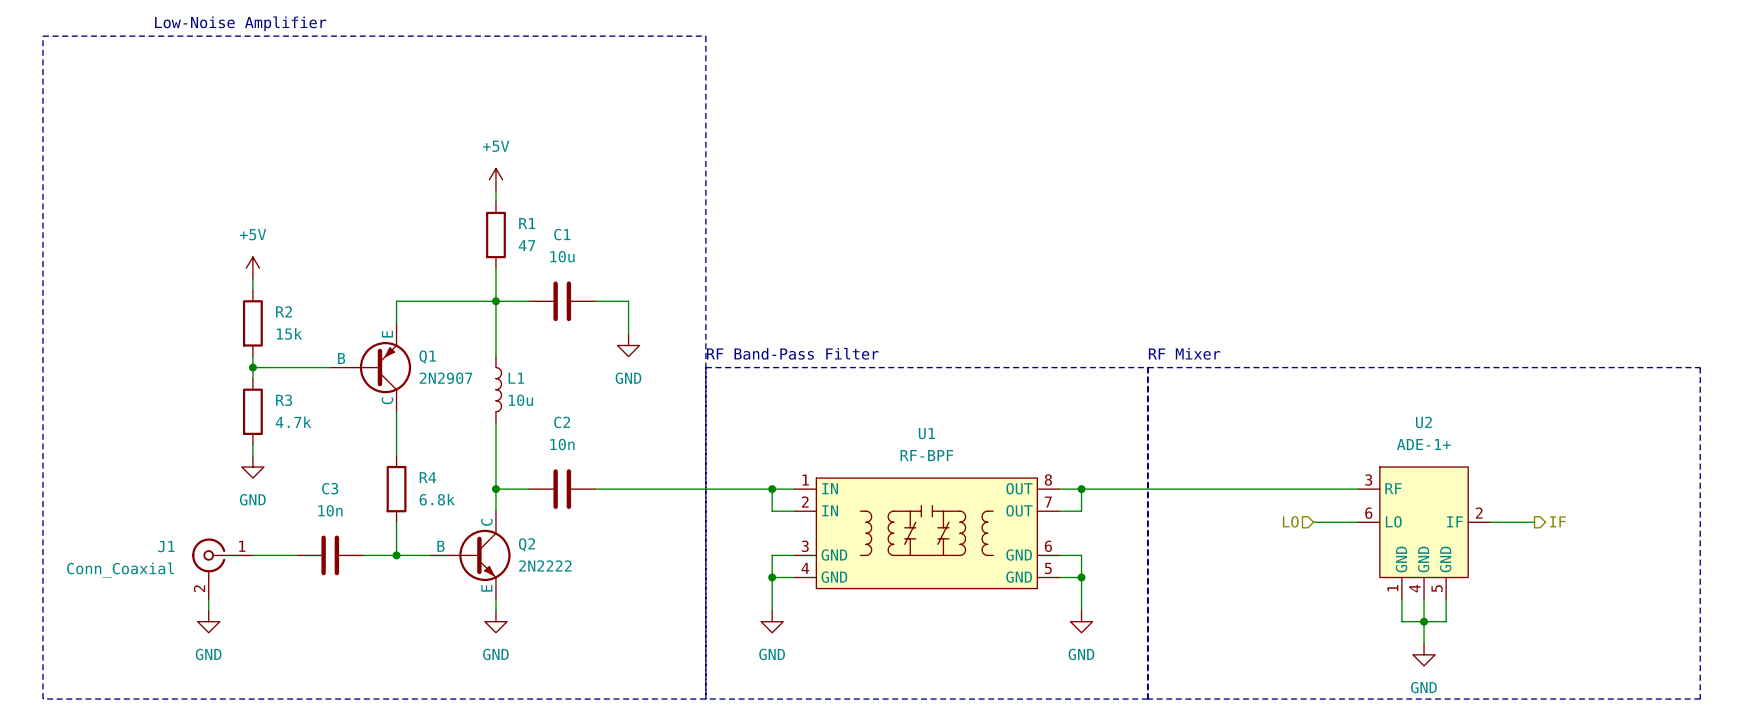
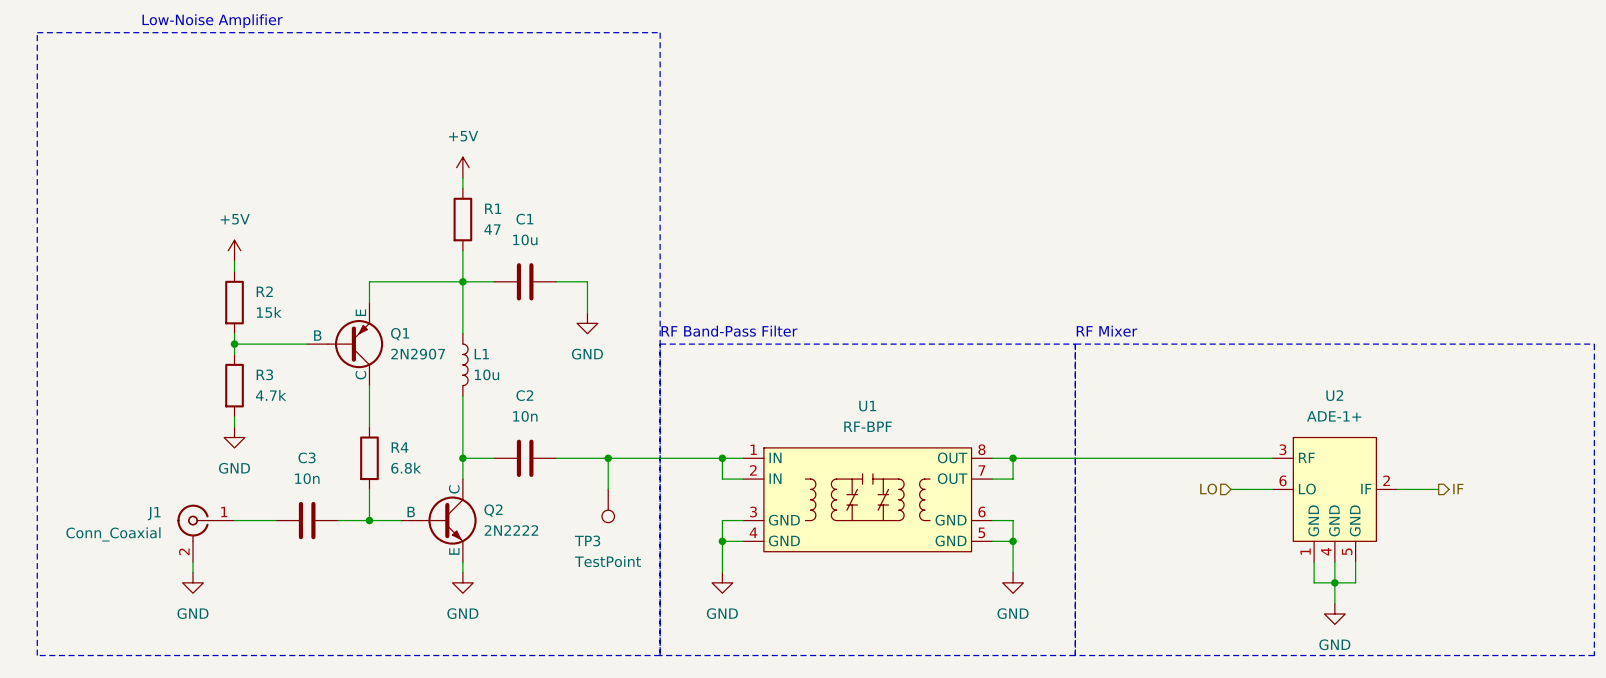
wire: none -> (608, 458) (608, 489)
junction: none -> (608, 458)
TP3: none -> TestPoint (608, 506)

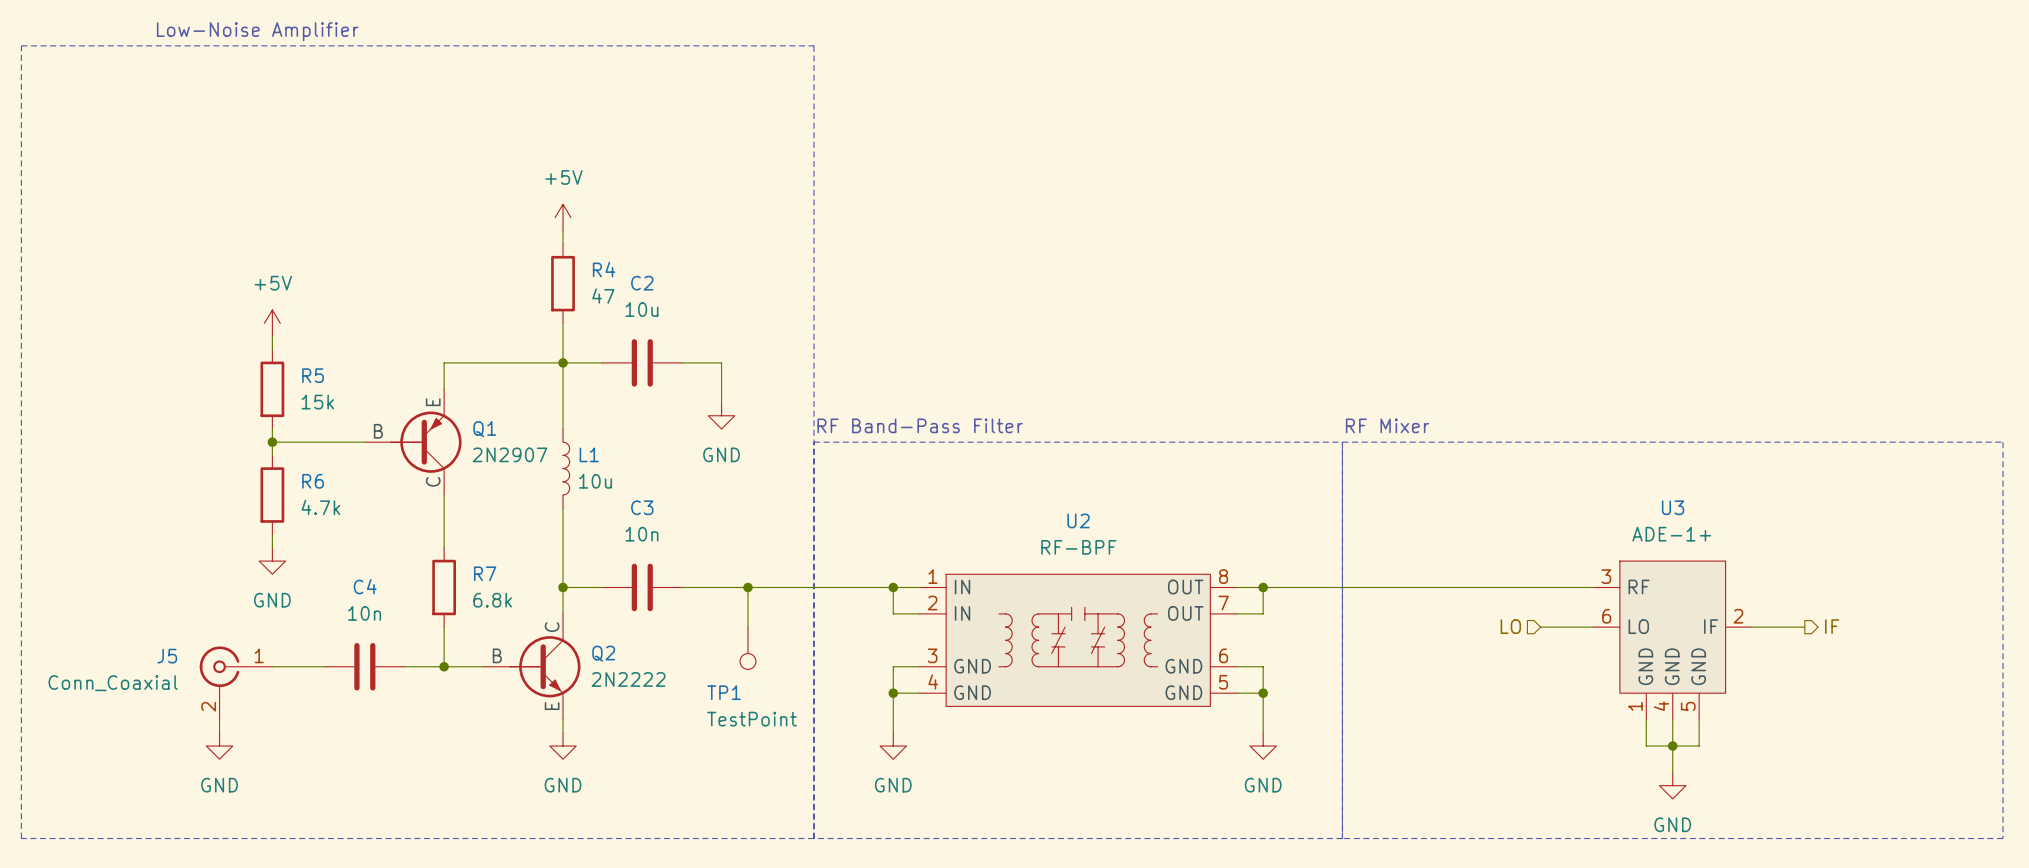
R1 name: R1 (493, 208) -> R4 (604, 269)
C1 name: C1 (524, 219) -> C2 (642, 283)
R2 name: R2 (264, 291) -> R5 (313, 375)
R3 name: R3 (264, 374) -> R6 (313, 481)
C2 name: C2 (524, 395) -> C3 (642, 507)
U2 name: U2 (1334, 395) -> U3 (1673, 507)
U1 name: U1 (867, 406) -> U2 (1078, 520)
R4 name: R4 (400, 447) -> R7 (485, 573)
C3 name: C3 (307, 457) -> C4 (365, 586)
J1 name: J1 (154, 513) -> J5 (167, 656)
TP3 name: TP3 (587, 540) -> TP1 (724, 692)

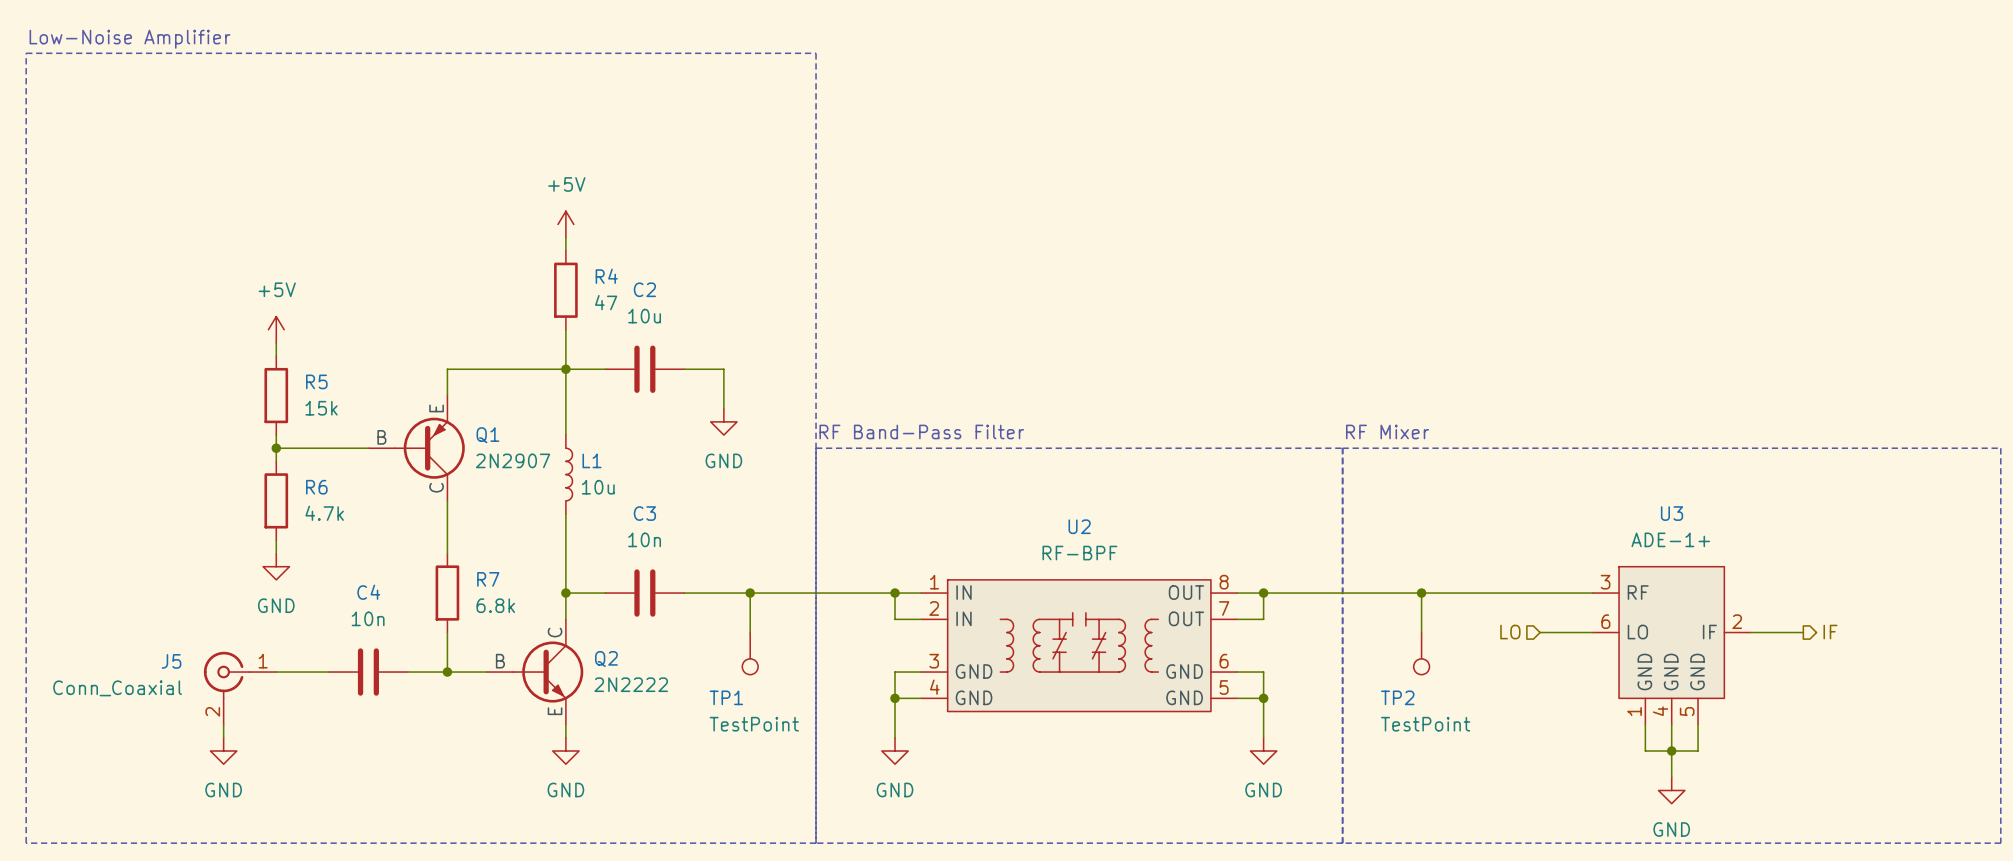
text position: Low-Noise Amplifier (257, 31) -> Low-Noise Amplifier (130, 39)
wire: none -> (1421, 593) (1421, 632)
junction: none -> (1421, 593)
TP2: none -> TestPoint (1421, 653)

